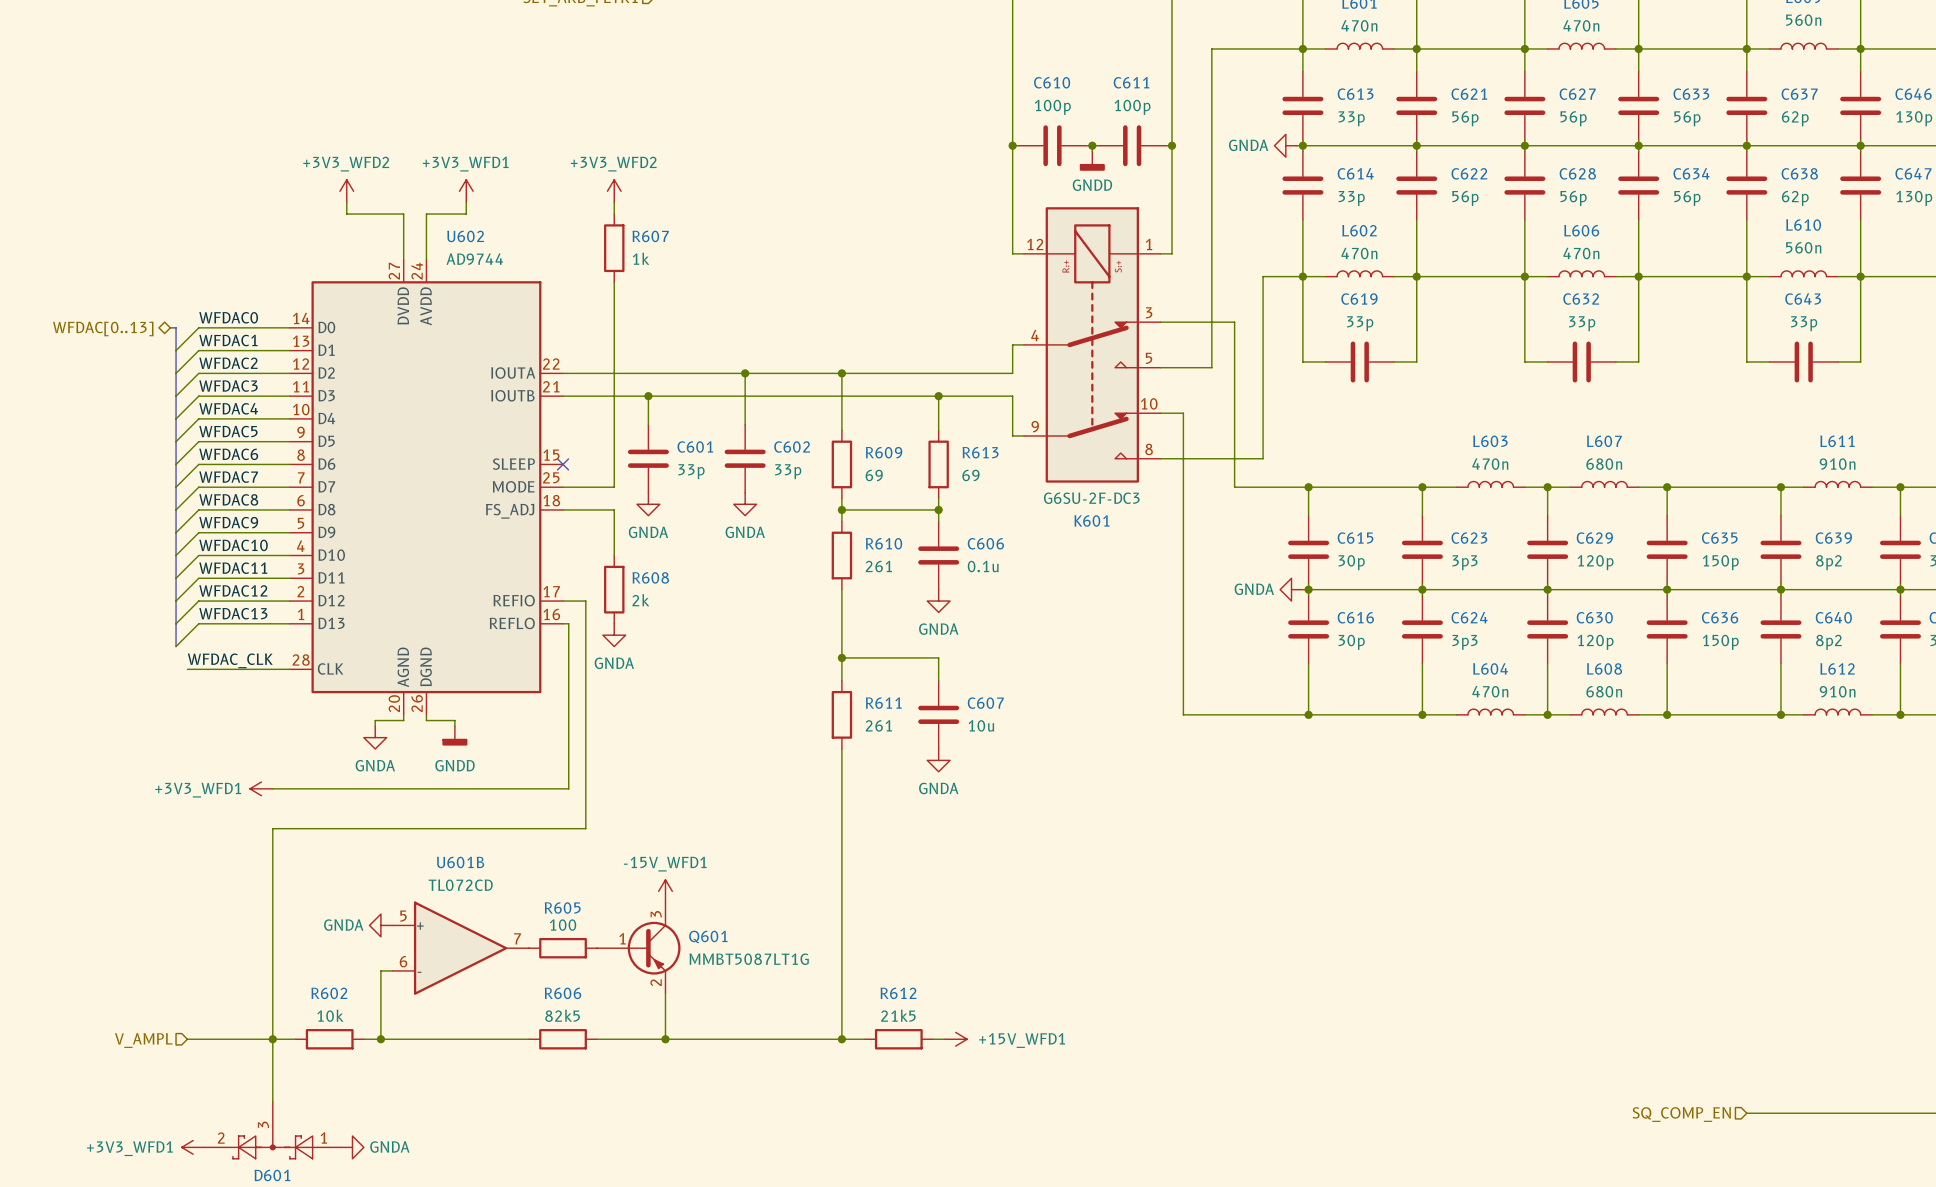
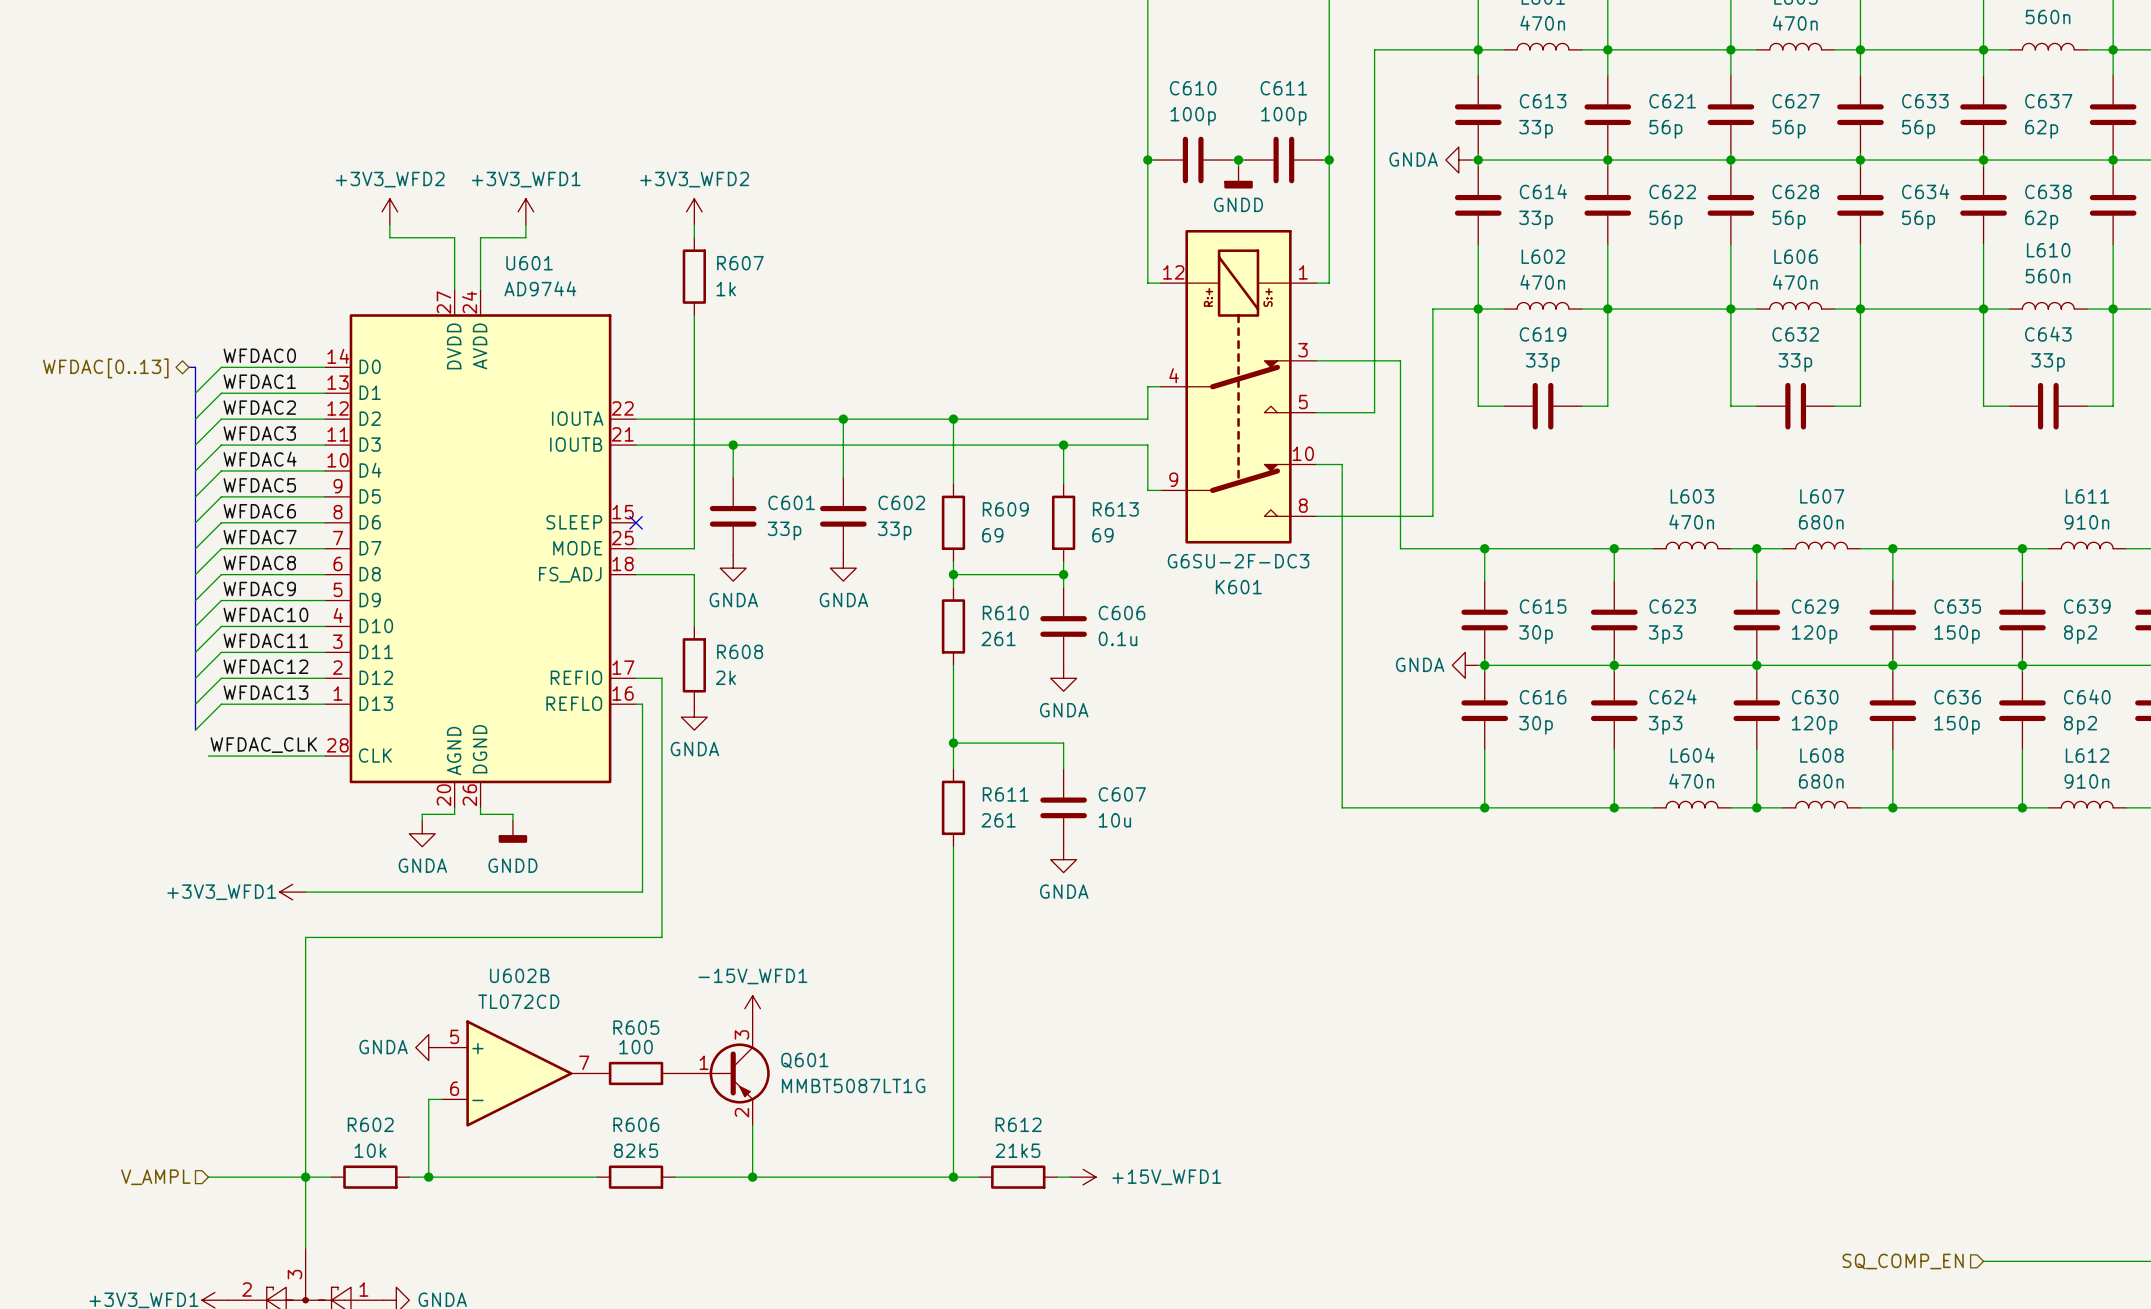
U602 name: U602 (465, 236) -> U601 (529, 263)
U601B name: U601B (460, 862) -> U602B (519, 975)

